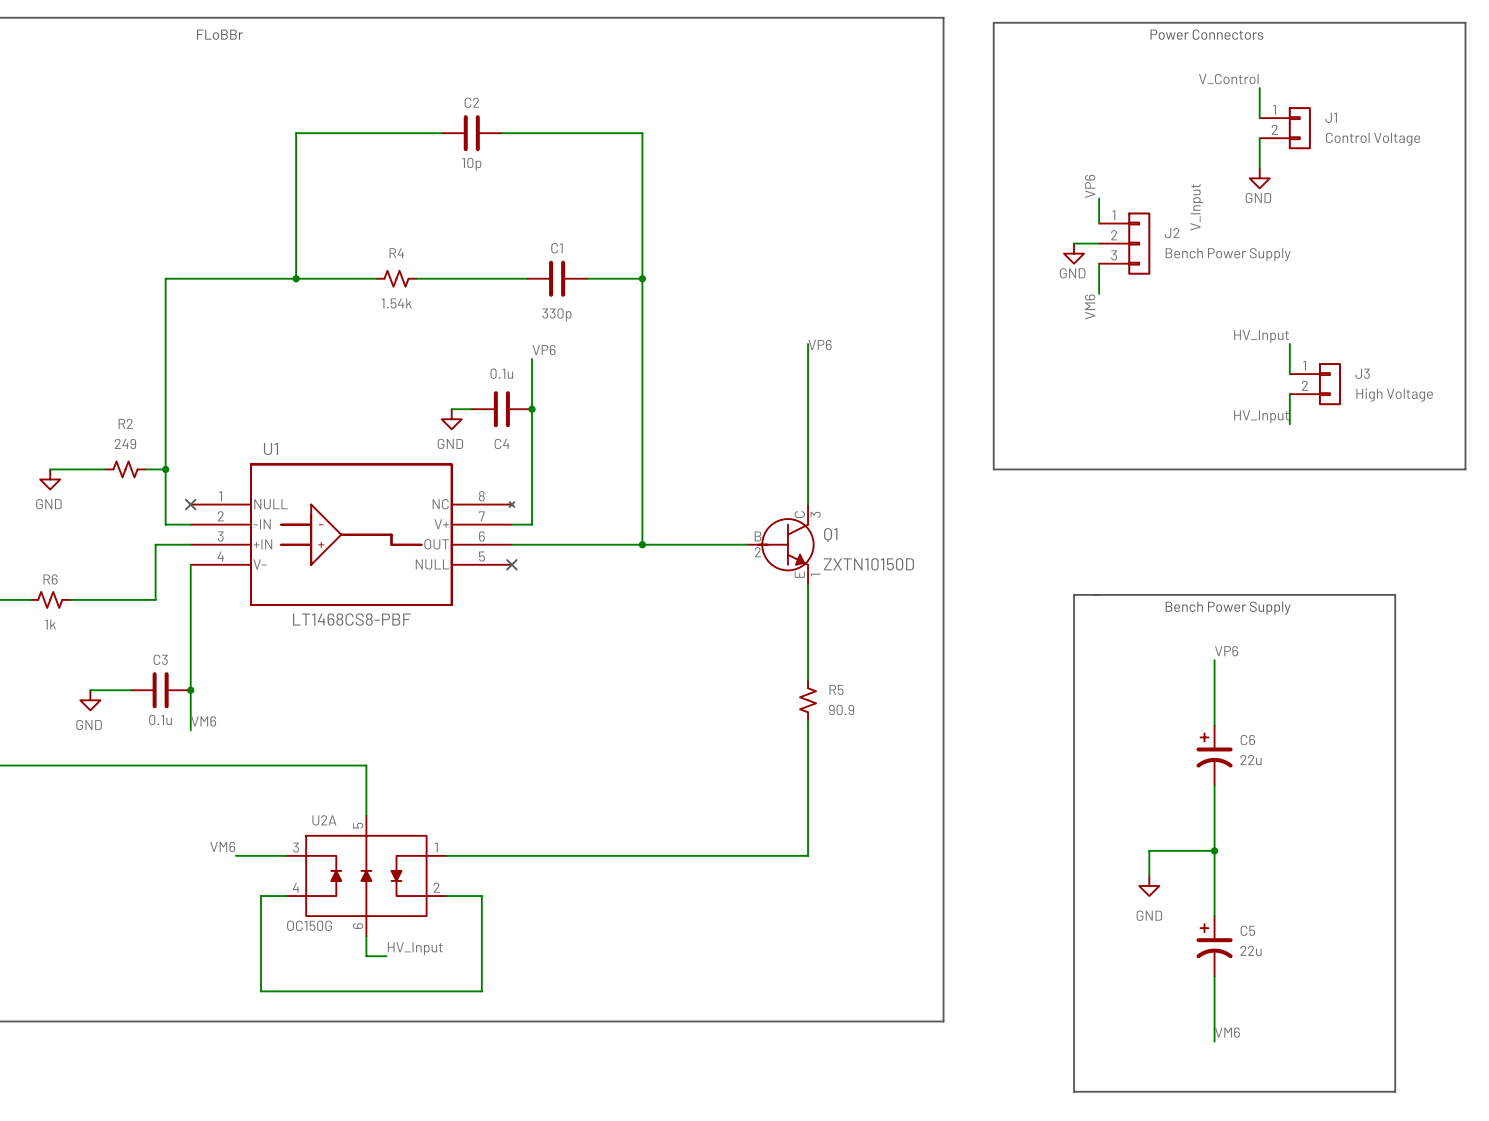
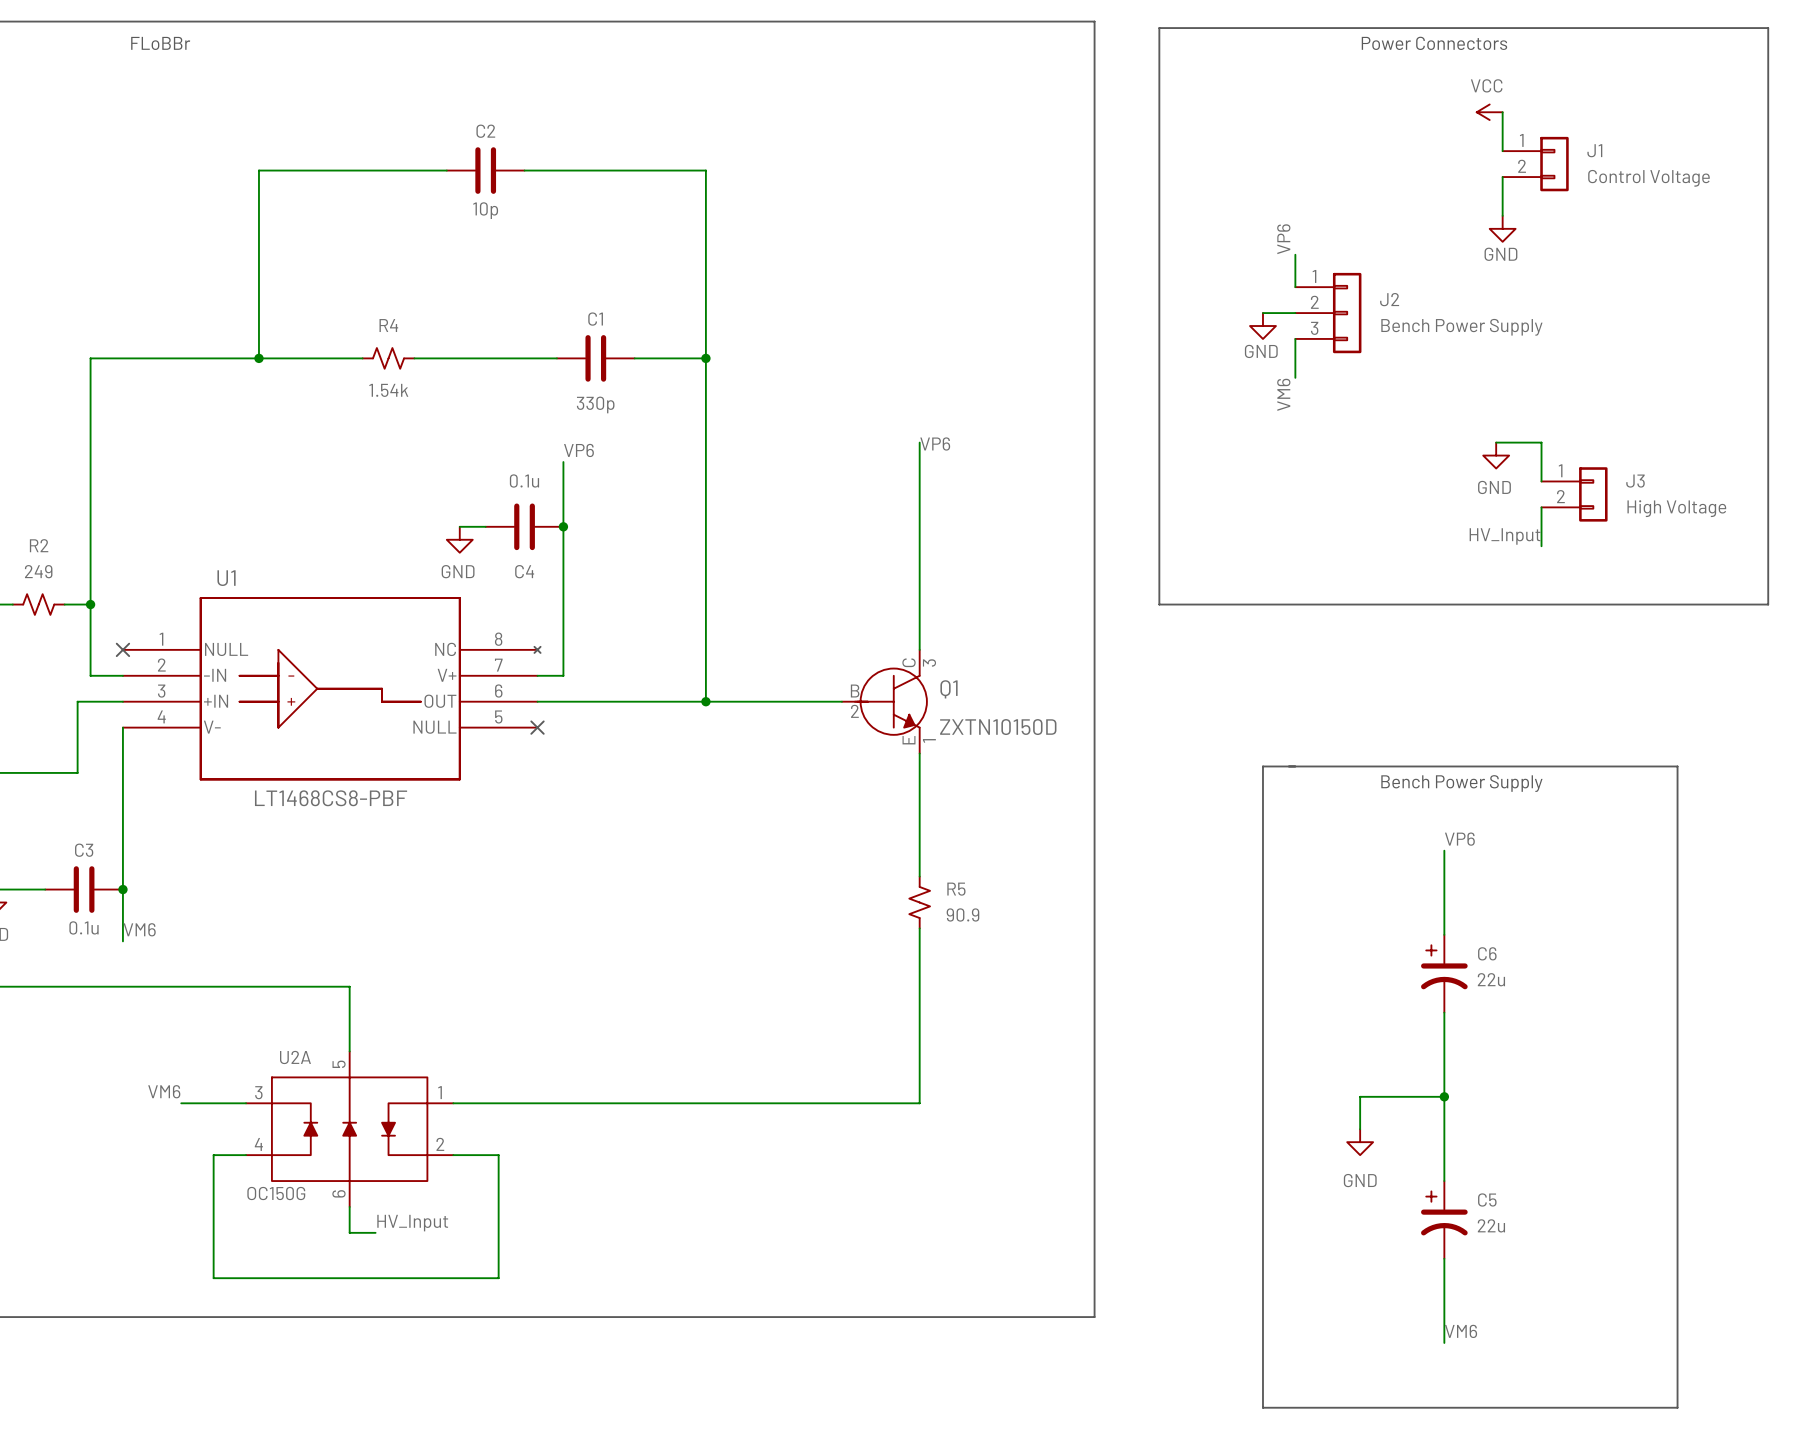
label: V_Control (1228, 79) -> none
power symbol: none -> VCC (1489, 112)
label: V_Input (1196, 207) -> none
label: HV_Input (1261, 336) -> none
wire: none -> (1496, 442) (1541, 442)
power symbol: none -> GND (1496, 455)

